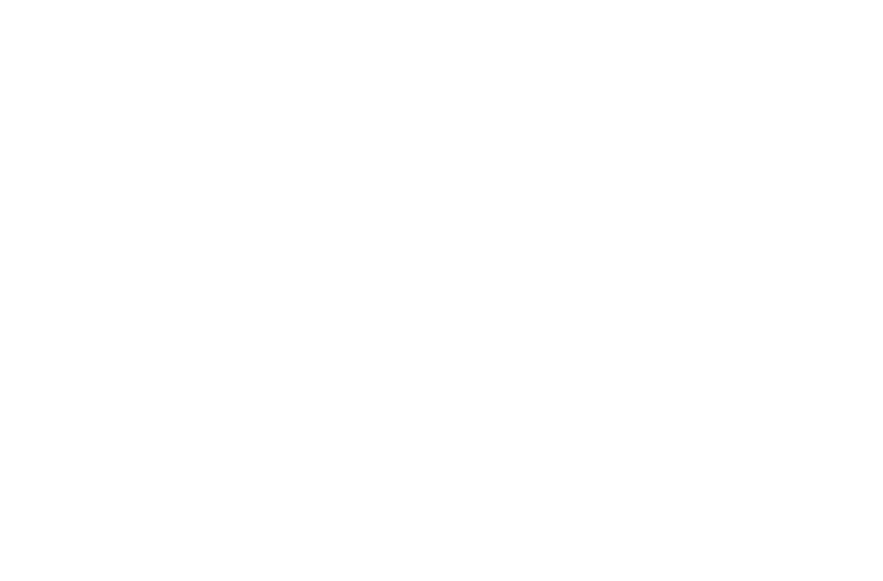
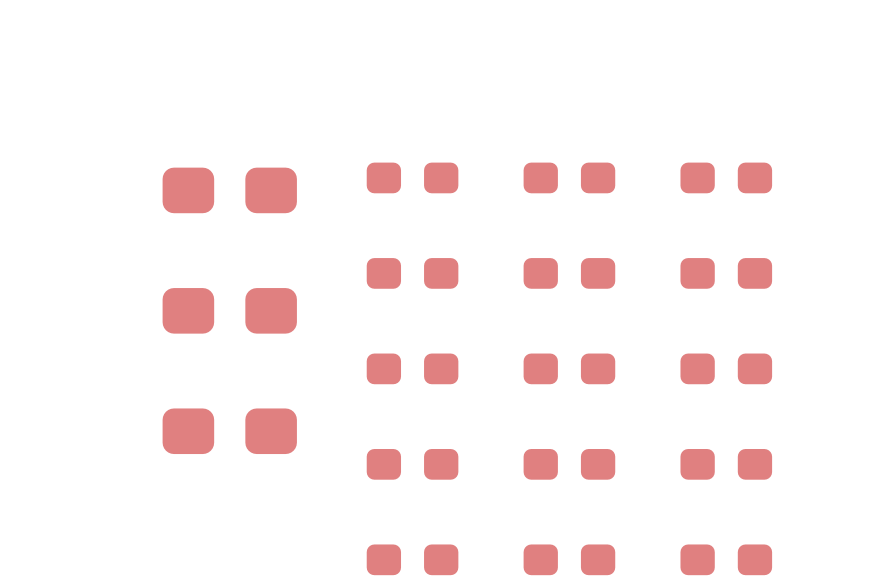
part: none -> (412, 177)
part: none -> (569, 177)
part: none -> (726, 177)
part: none -> (229, 190)
part: none -> (412, 273)
part: none -> (569, 273)
part: none -> (726, 273)
part: none -> (229, 310)
part: none -> (412, 368)
part: none -> (569, 368)
part: none -> (726, 368)
part: none -> (229, 431)
part: none -> (412, 464)
part: none -> (569, 464)
part: none -> (726, 464)
part: none -> (412, 559)
part: none -> (569, 559)
part: none -> (726, 559)

